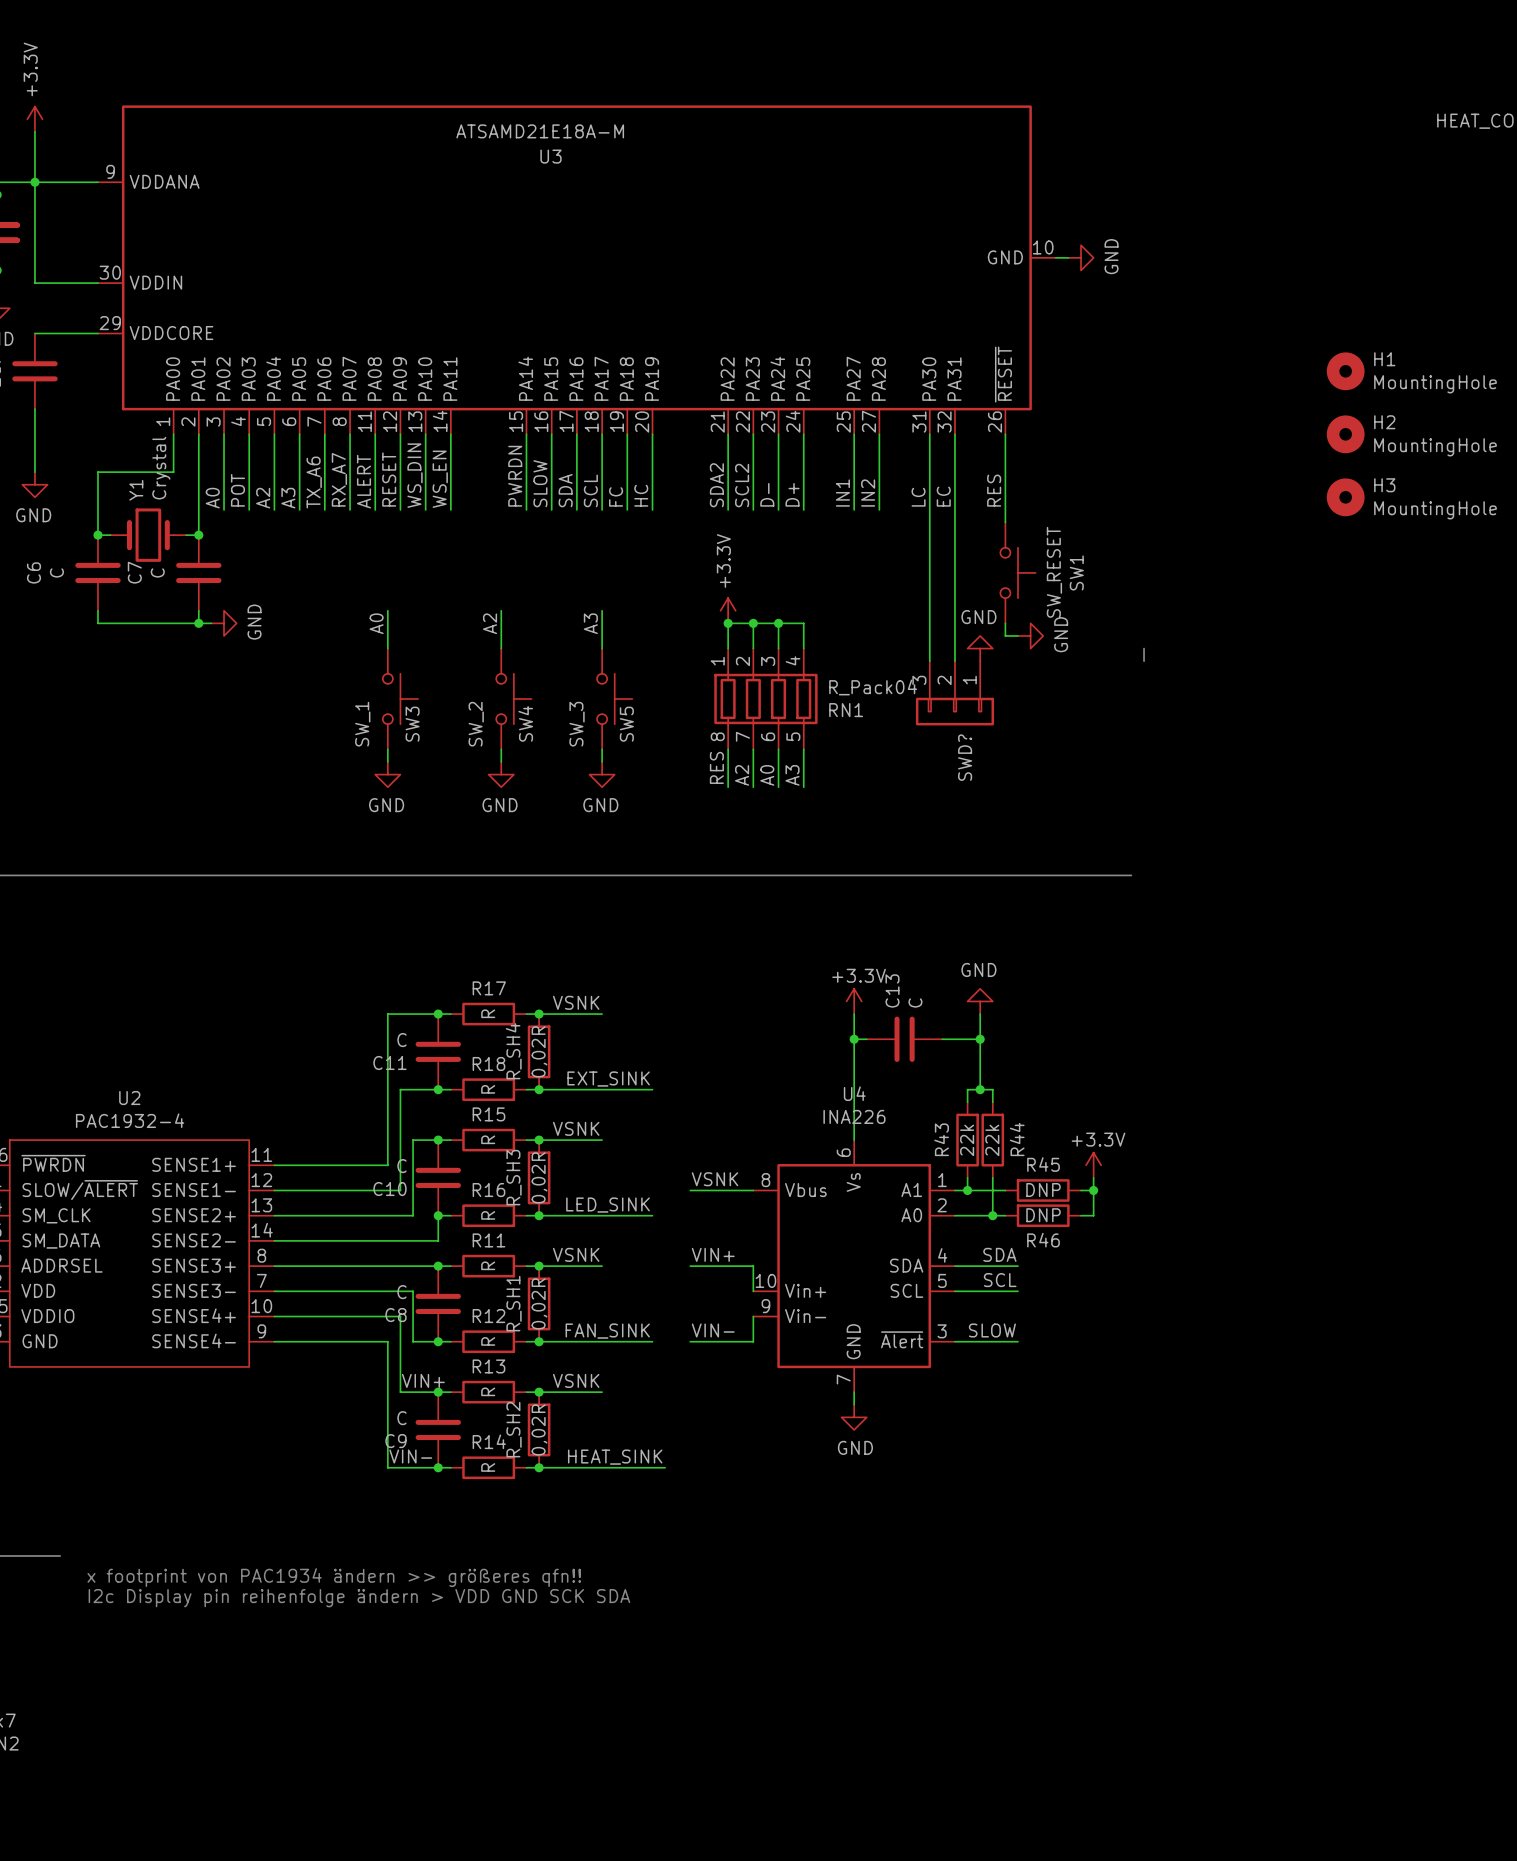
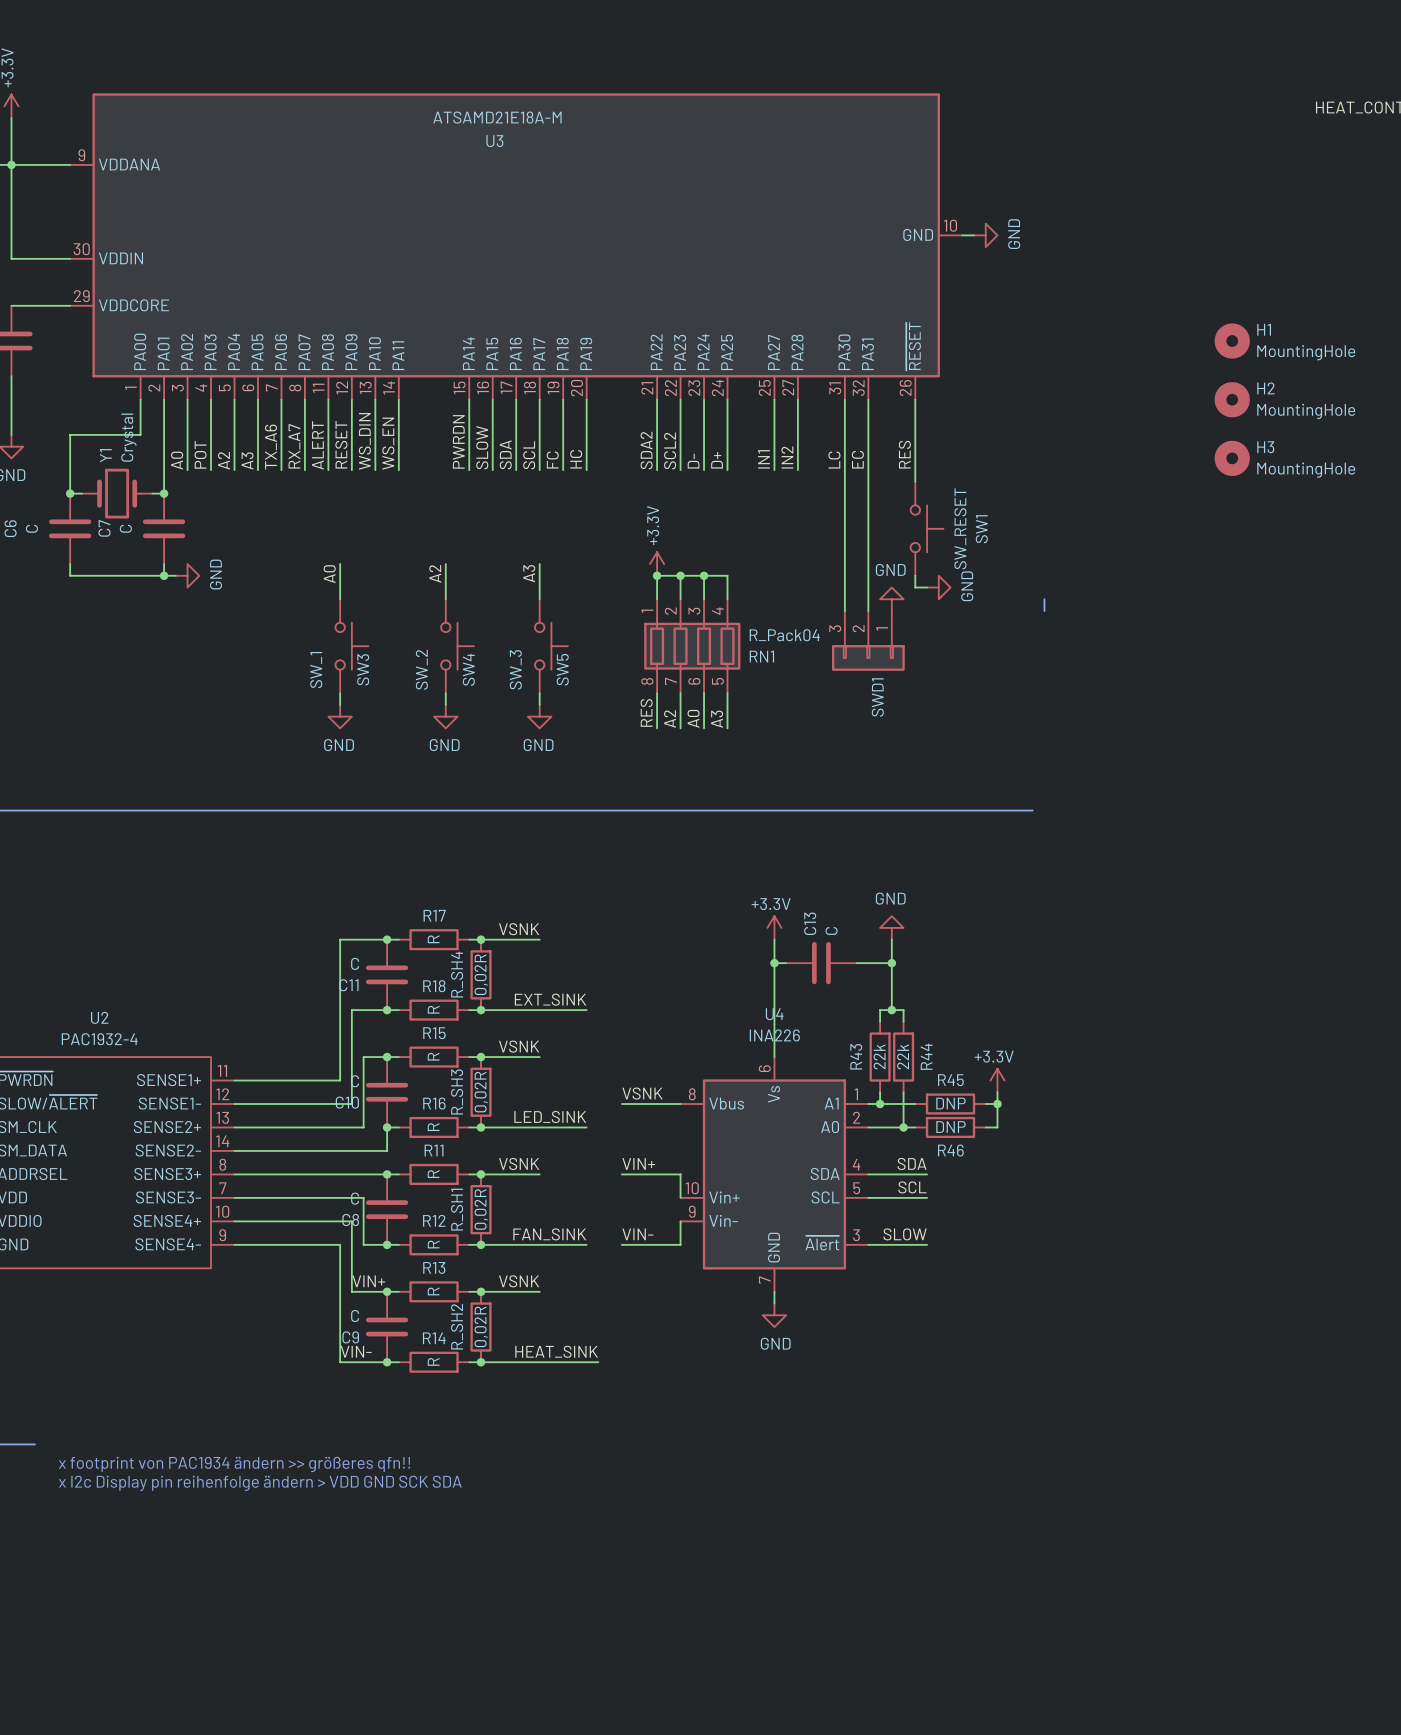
SWD? name: SWD? (965, 757) -> SWD1 (877, 697)
text: I2c Display pin reihenfolge ändern > VDD GND SCK SDA (359, 1598) -> x I2c Display pin reihenfolge ändern > VDD GND SCK SDA (260, 1483)

